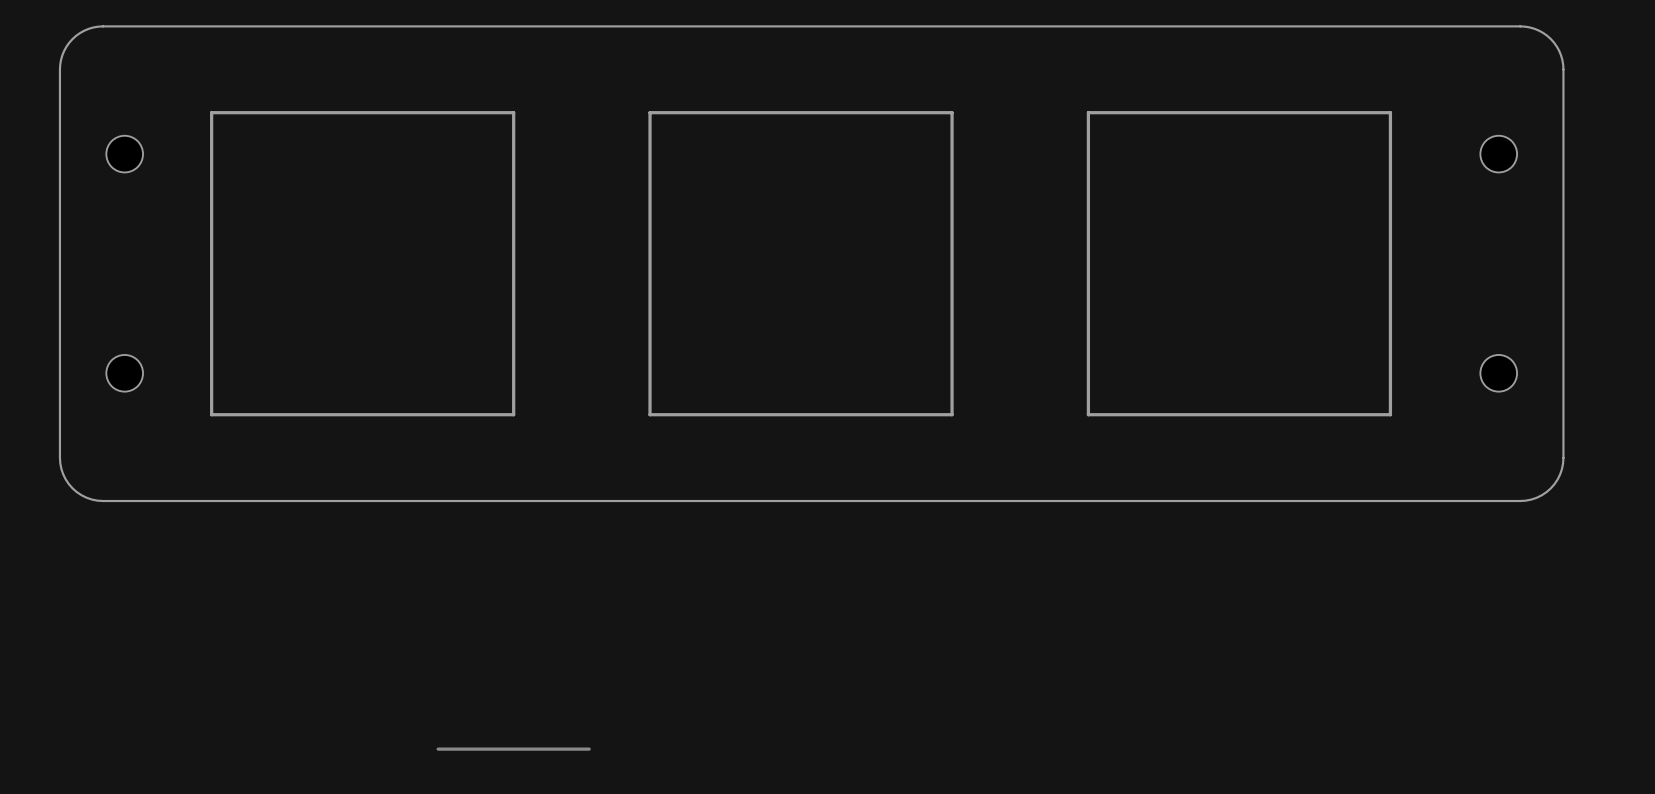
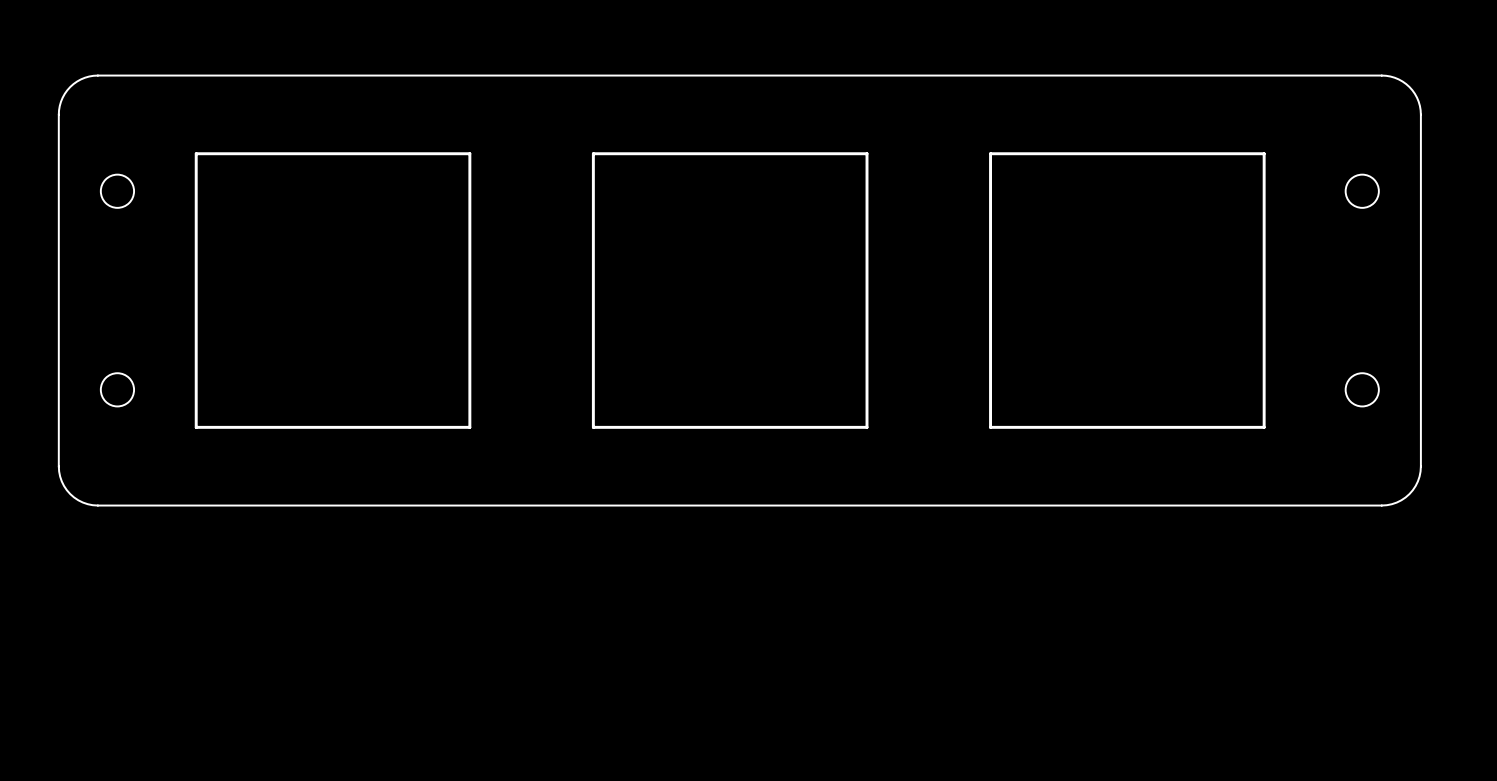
line: (438, 749) (589, 749) -> none

